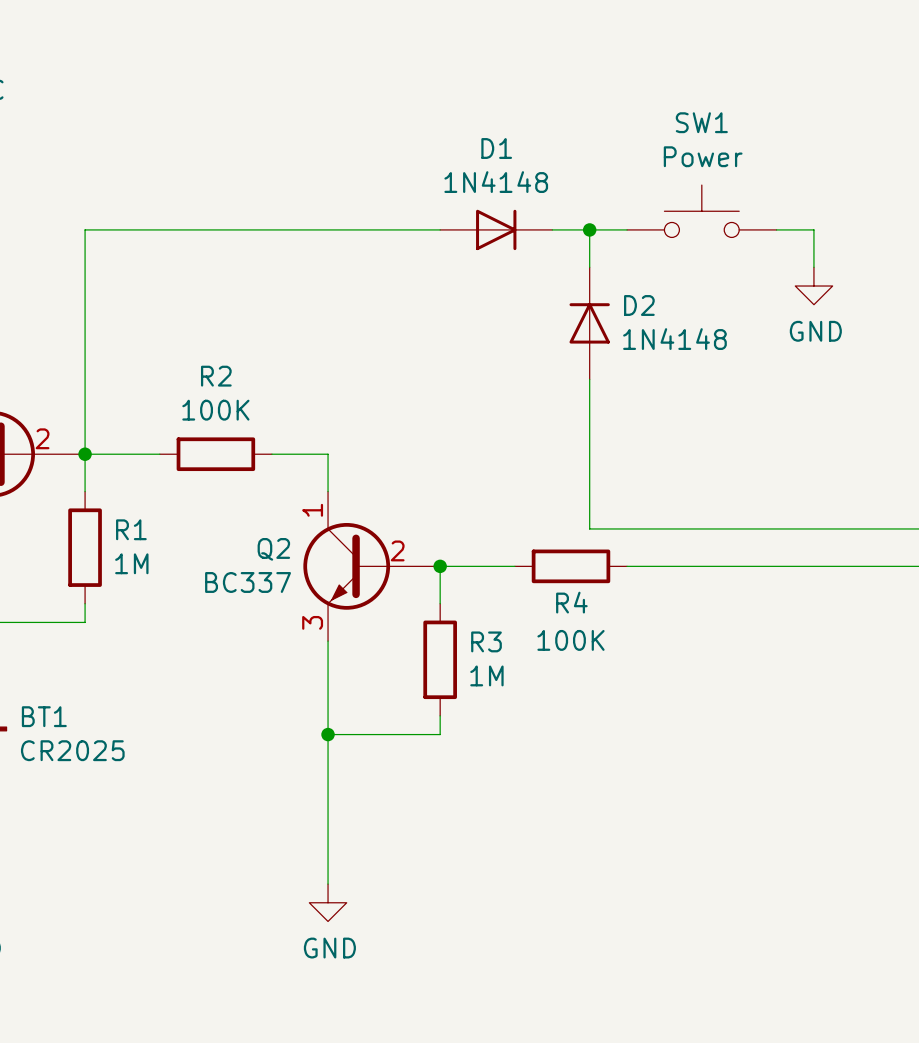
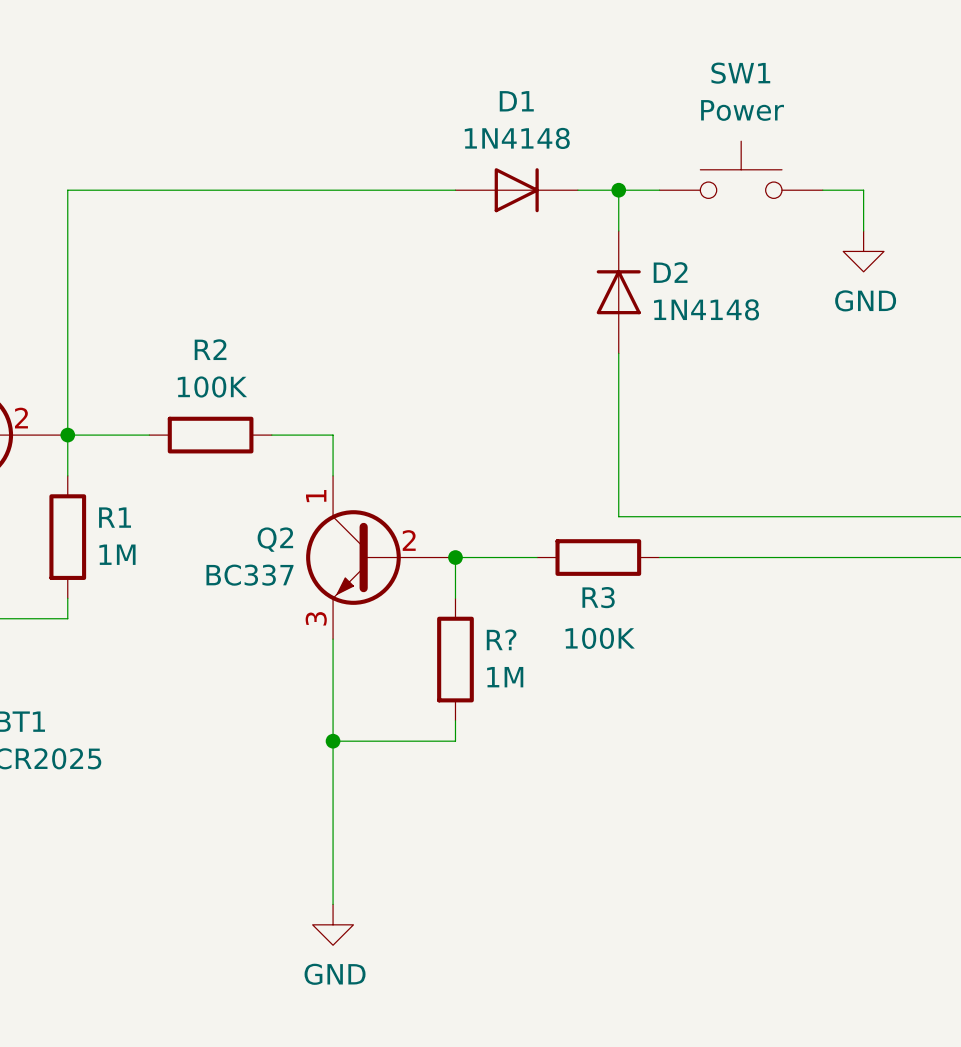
R4 name: R4 (571, 602) -> R3 (598, 597)
R3 name: R3 (486, 641) -> R? (501, 639)

